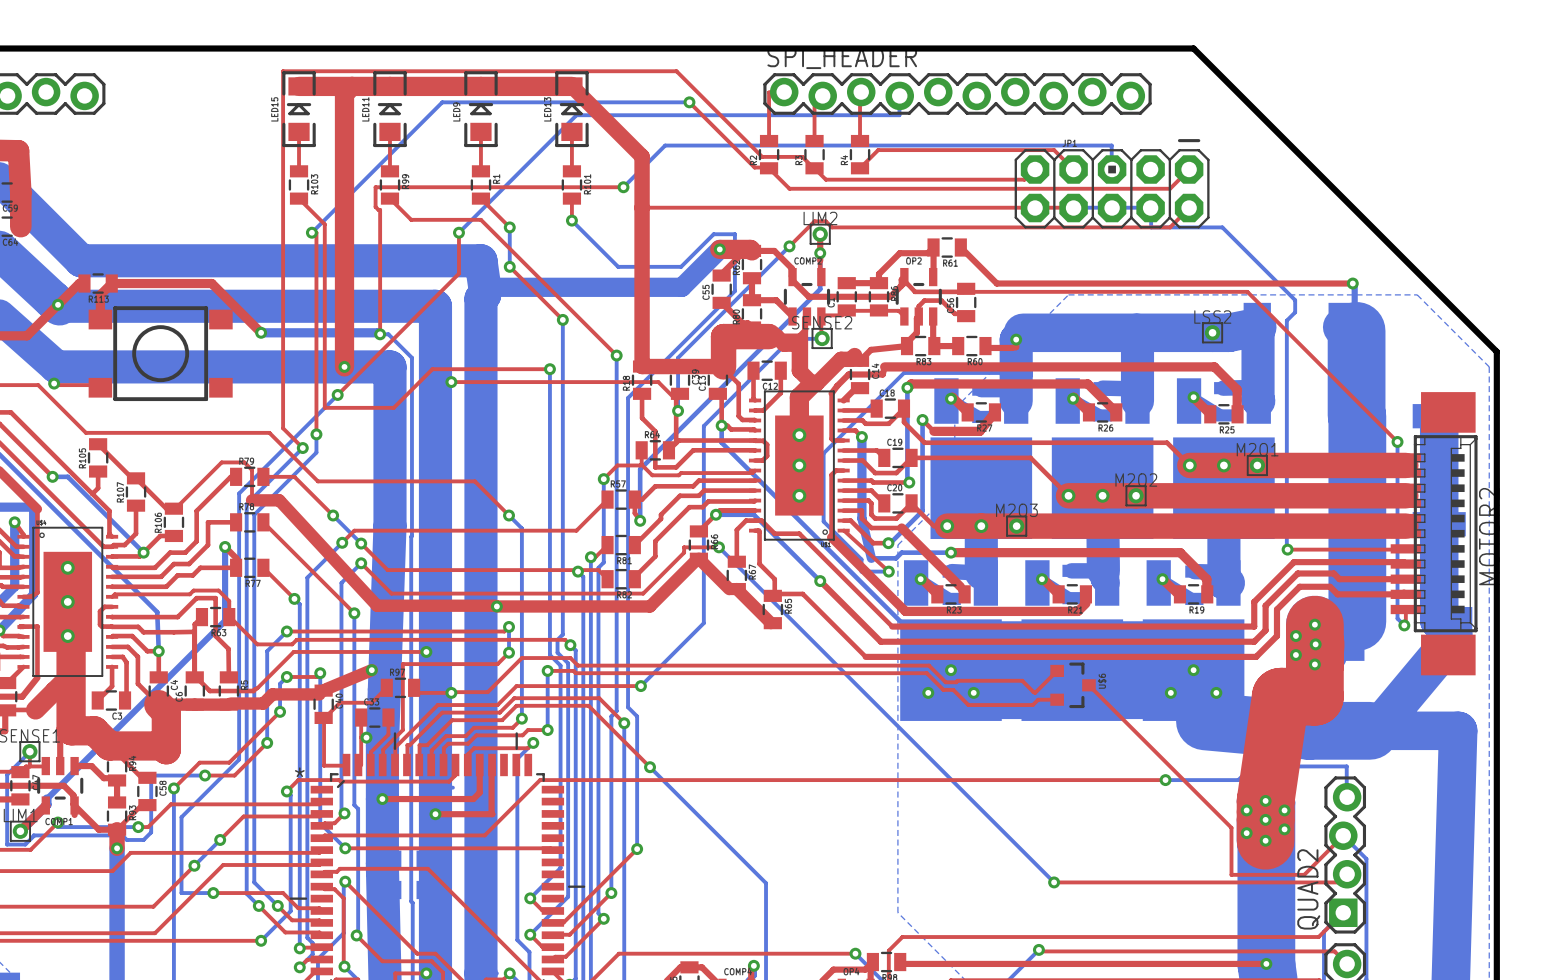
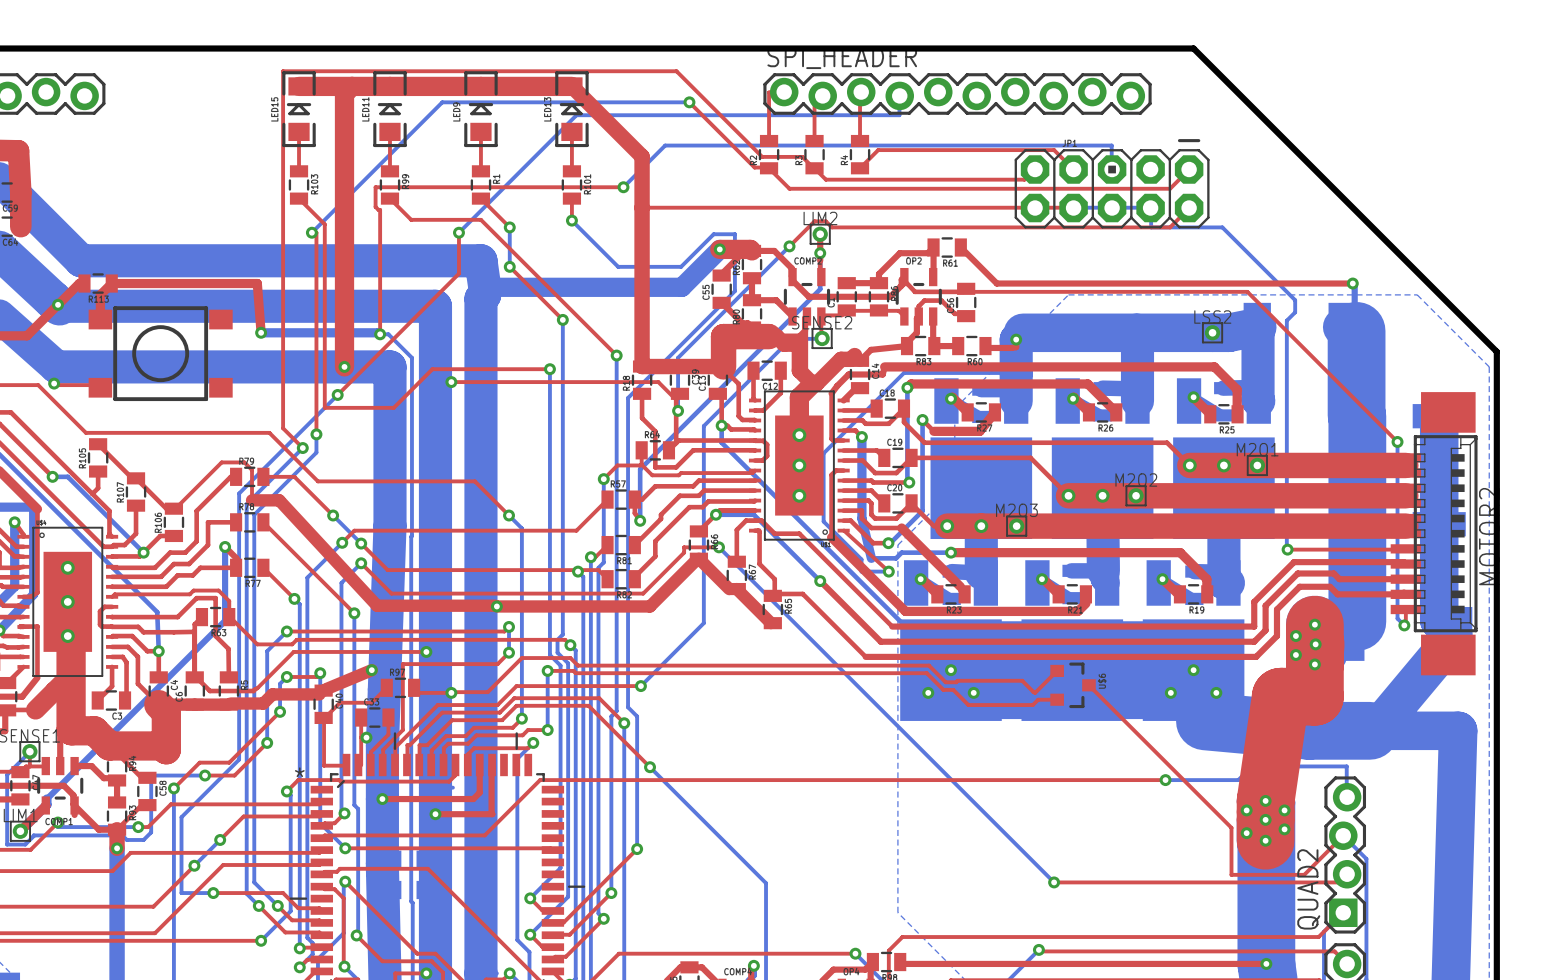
top track: (211, 283) (261, 332) -> (211, 283) (257, 283) (261, 332)

